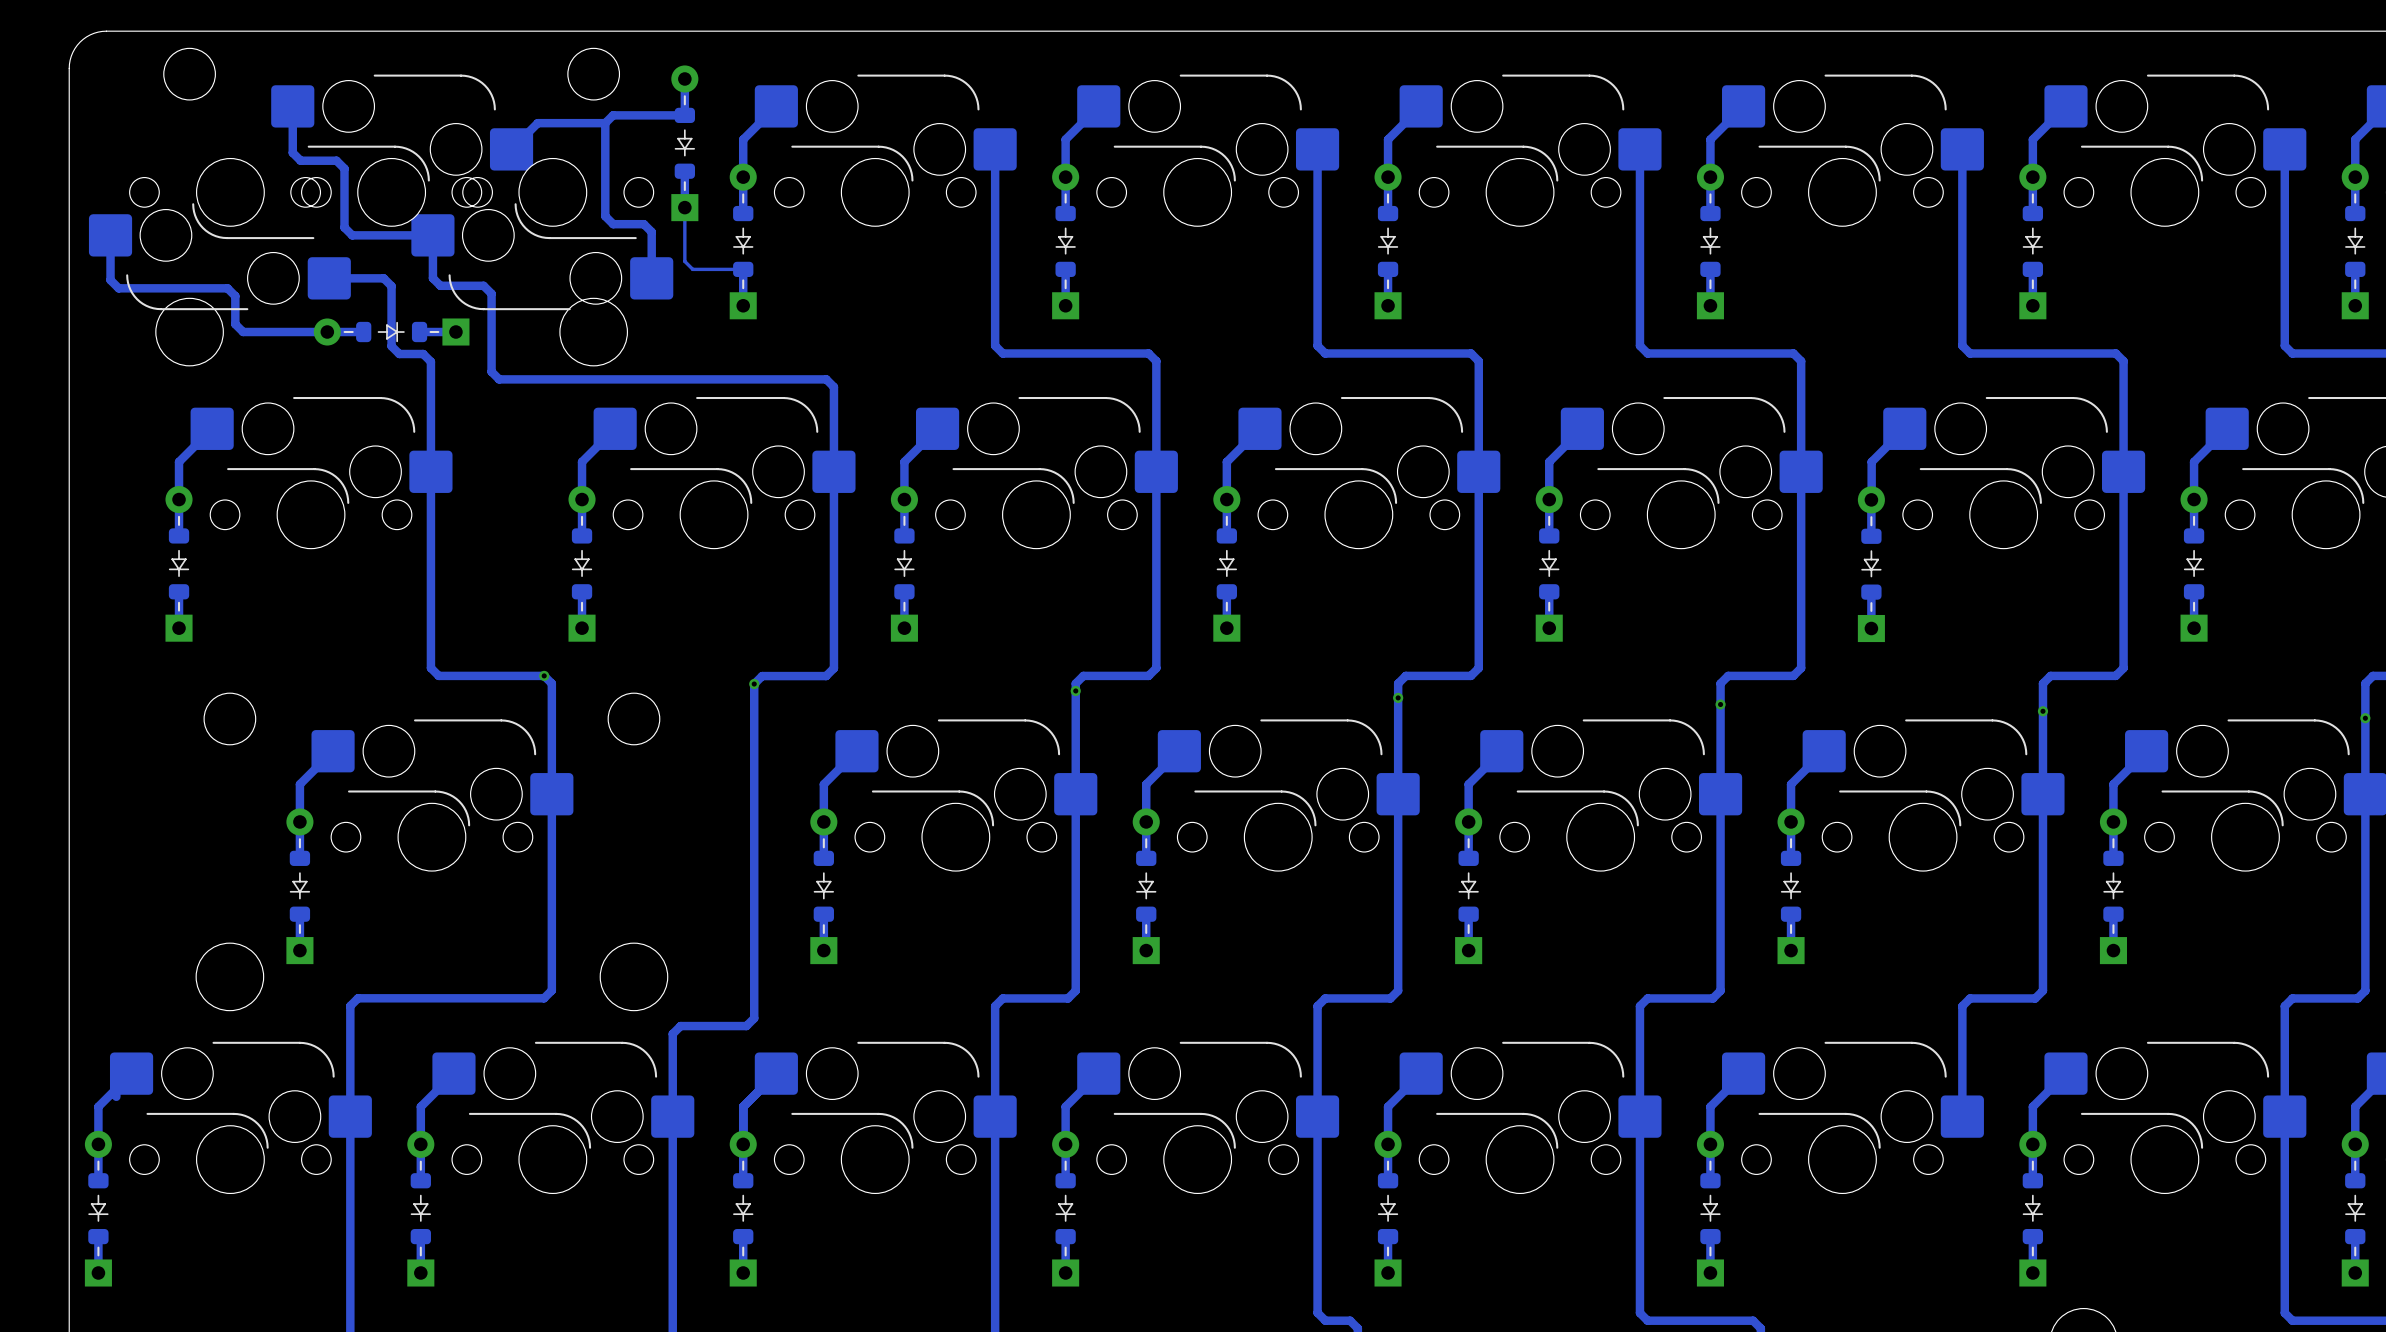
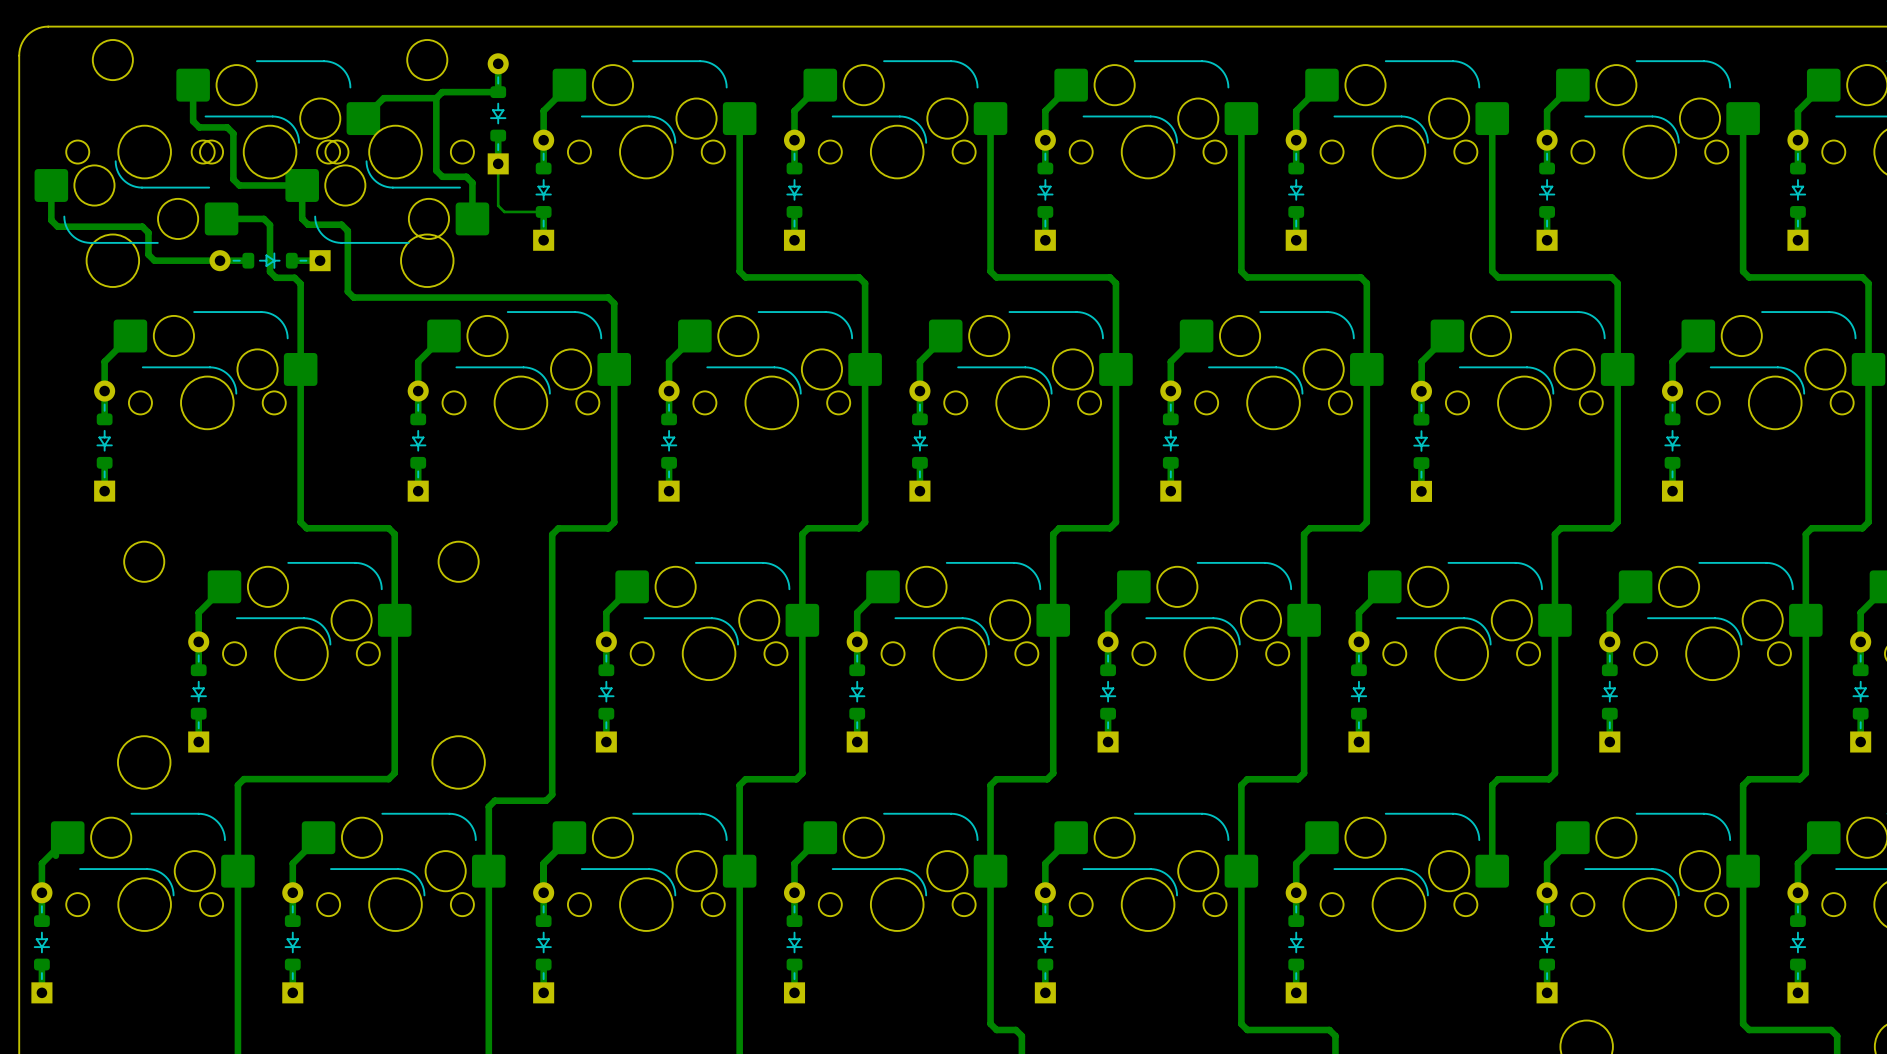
via: (544, 675) -> none
via: (754, 684) -> none
via: (1075, 690) -> none
via: (1398, 697) -> none
via: (1720, 704) -> none
via: (2042, 711) -> none
via: (2365, 718) -> none

